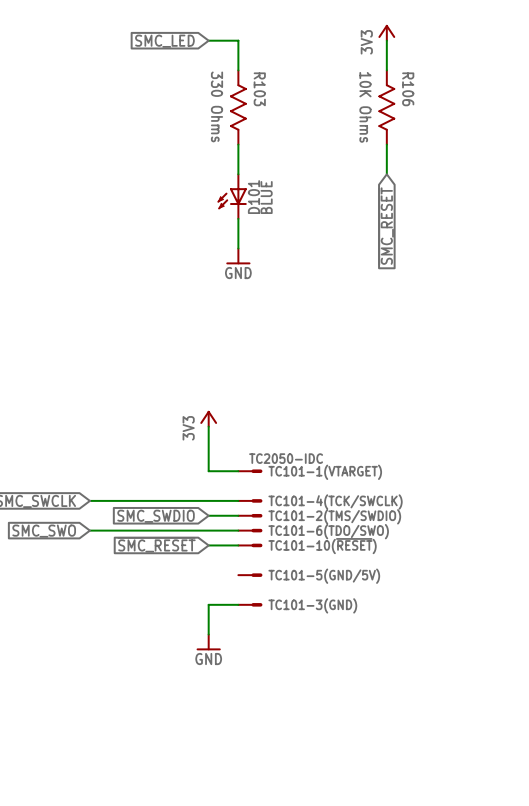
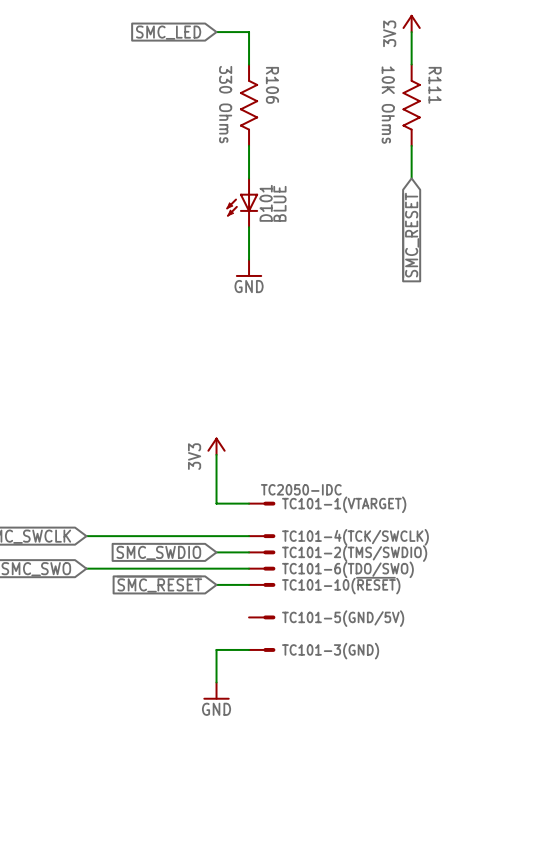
R103 name: R103 (259, 89) -> R106 (272, 85)
R106 name: R106 (408, 89) -> R111 (435, 85)

